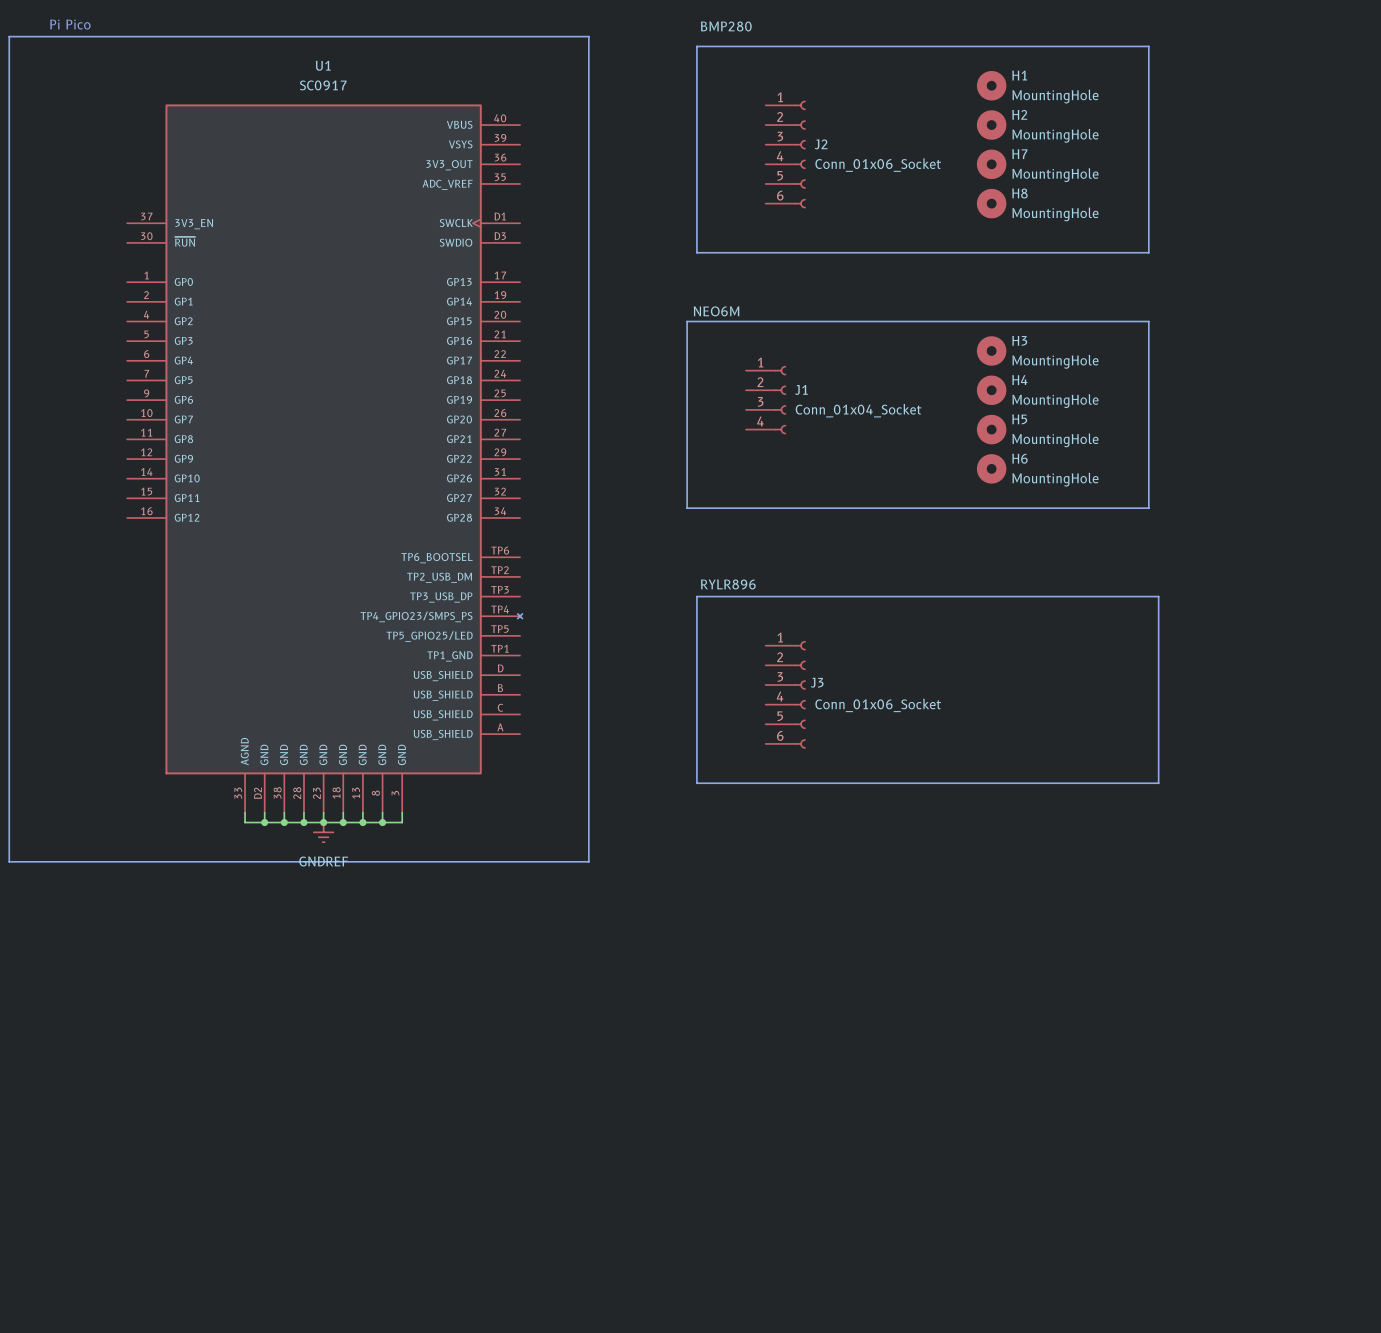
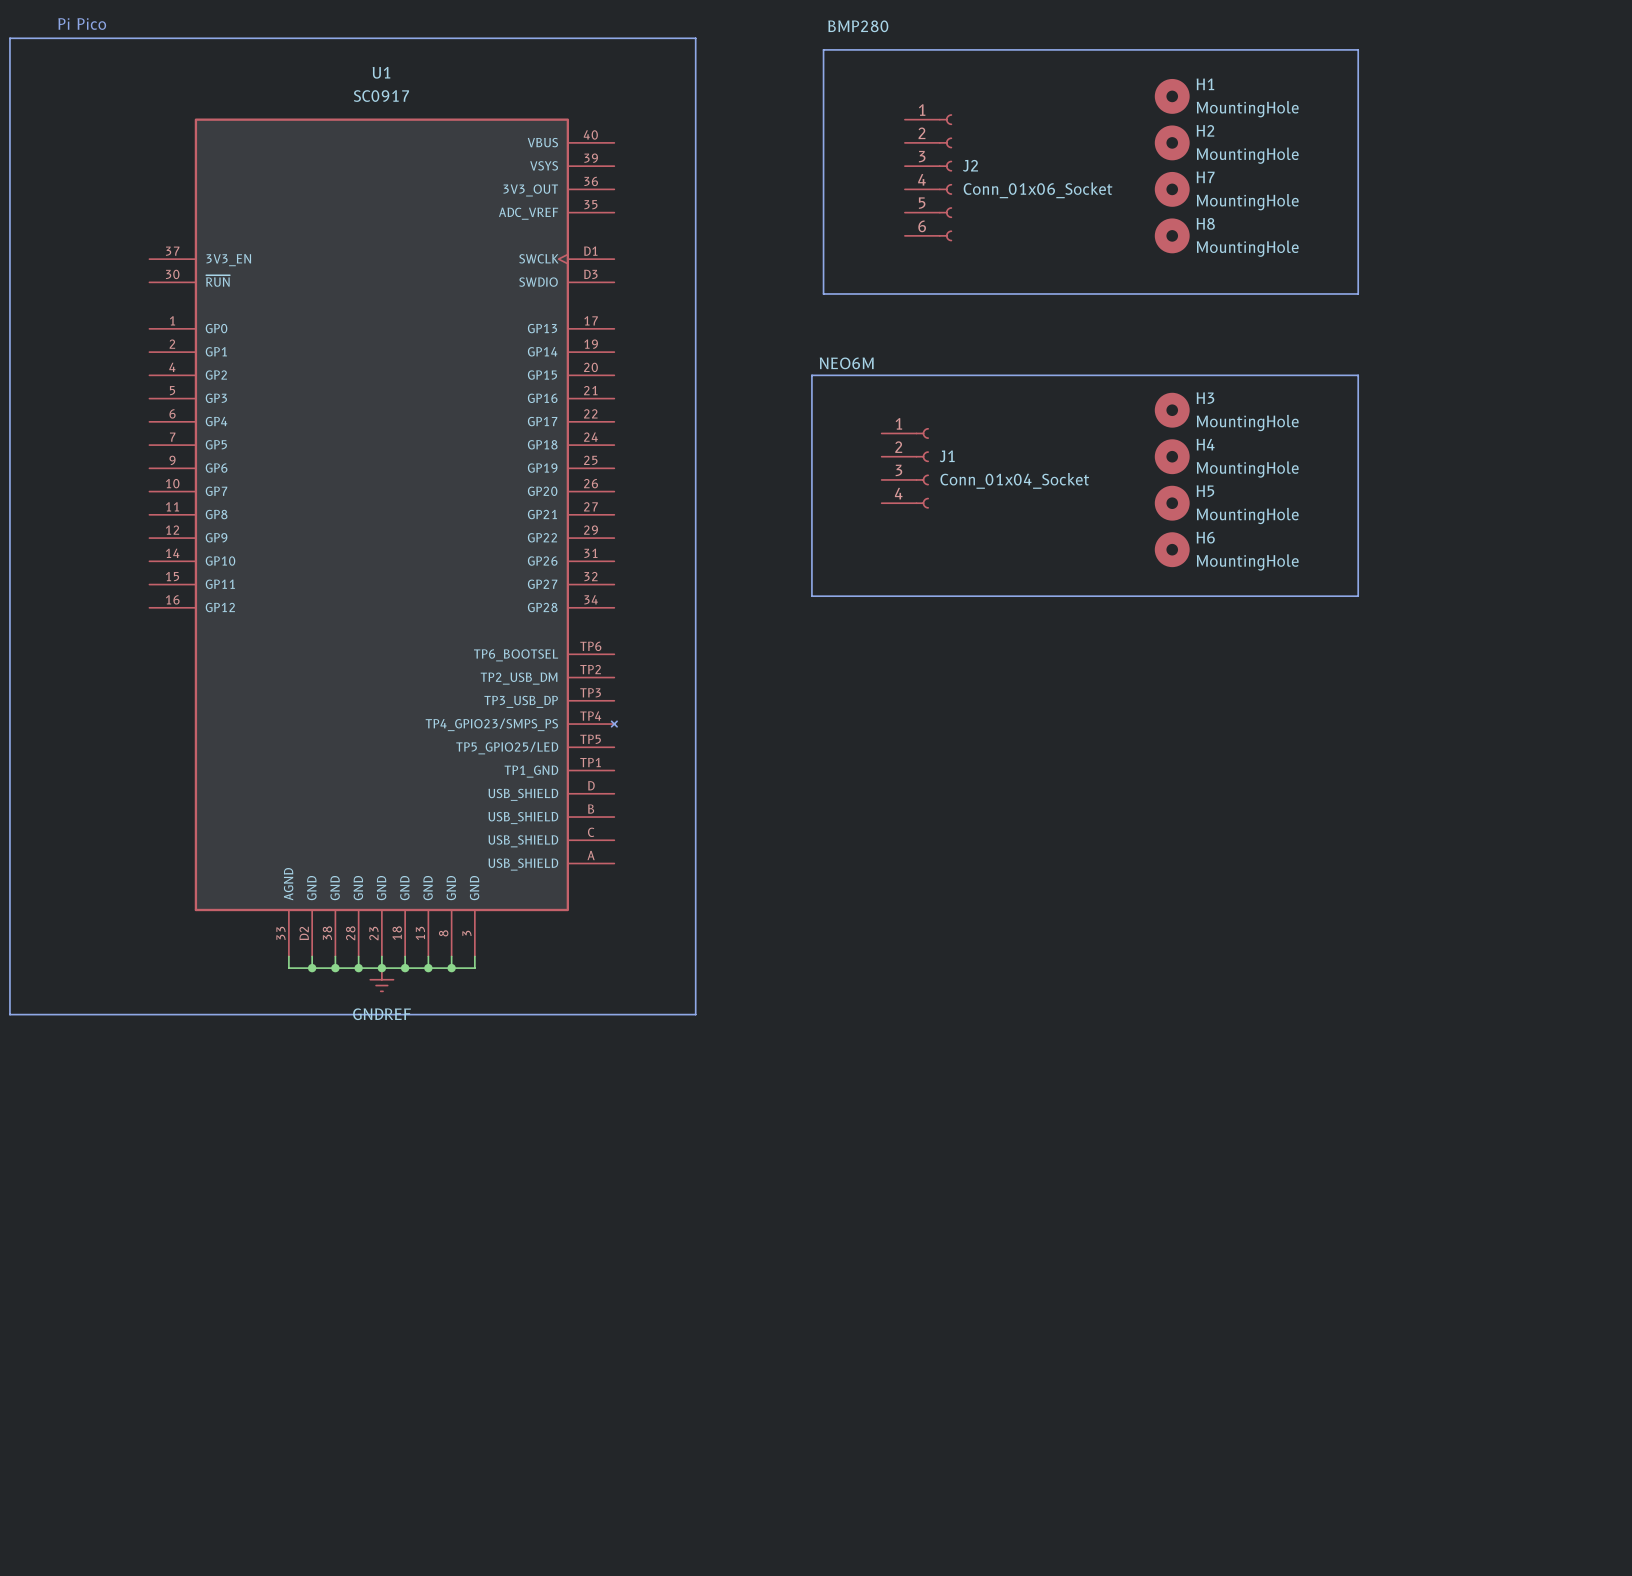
line: (696, 596) (1158, 596) (1158, 783) (696, 783) (696, 596) -> none
J3: Conn_01x06_Socket (785, 694) -> none

